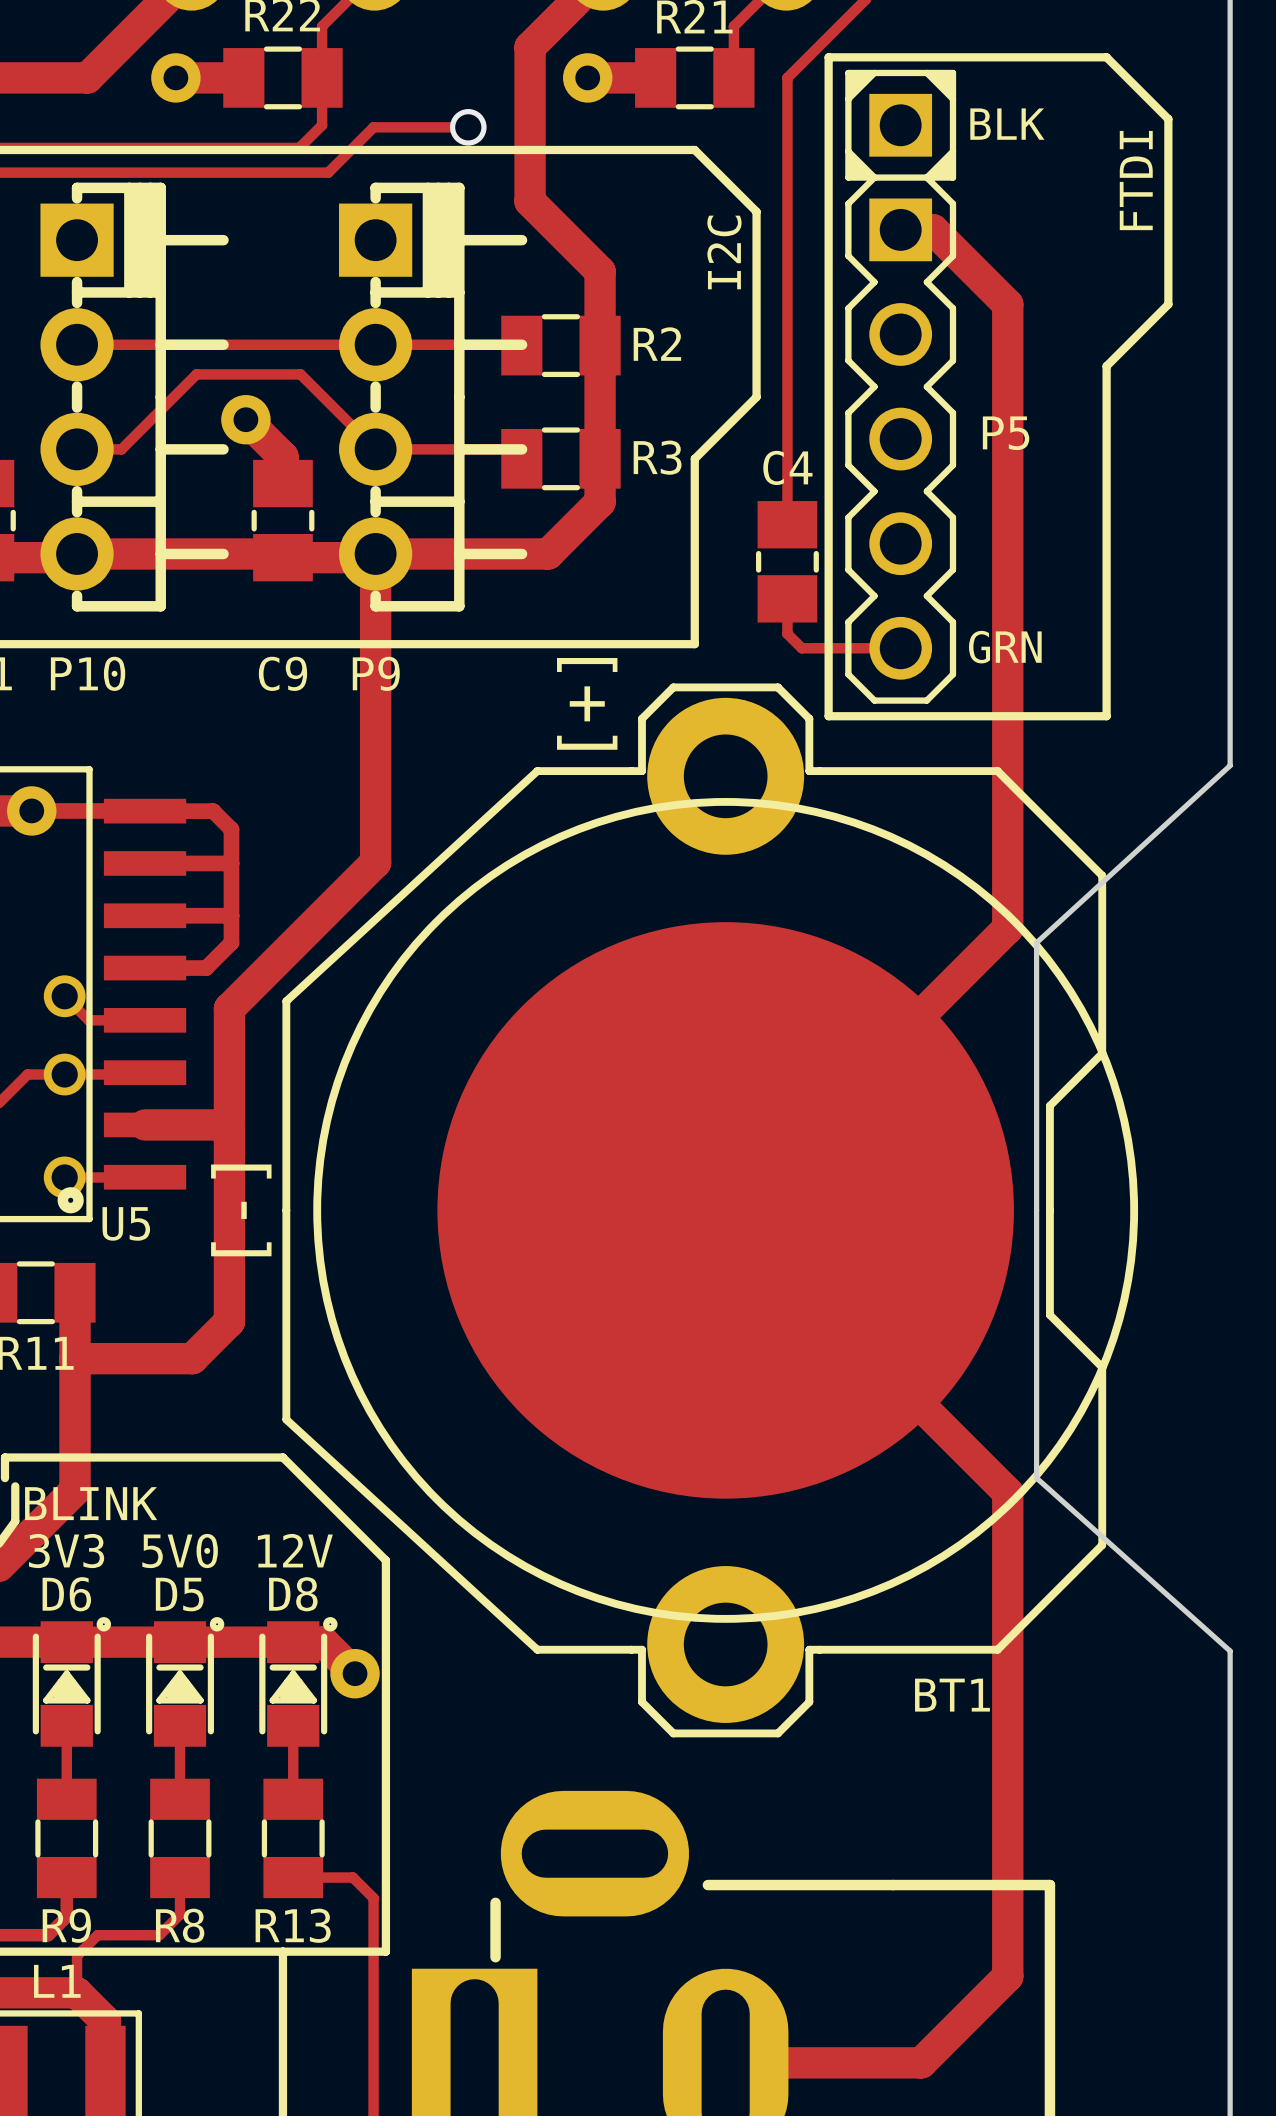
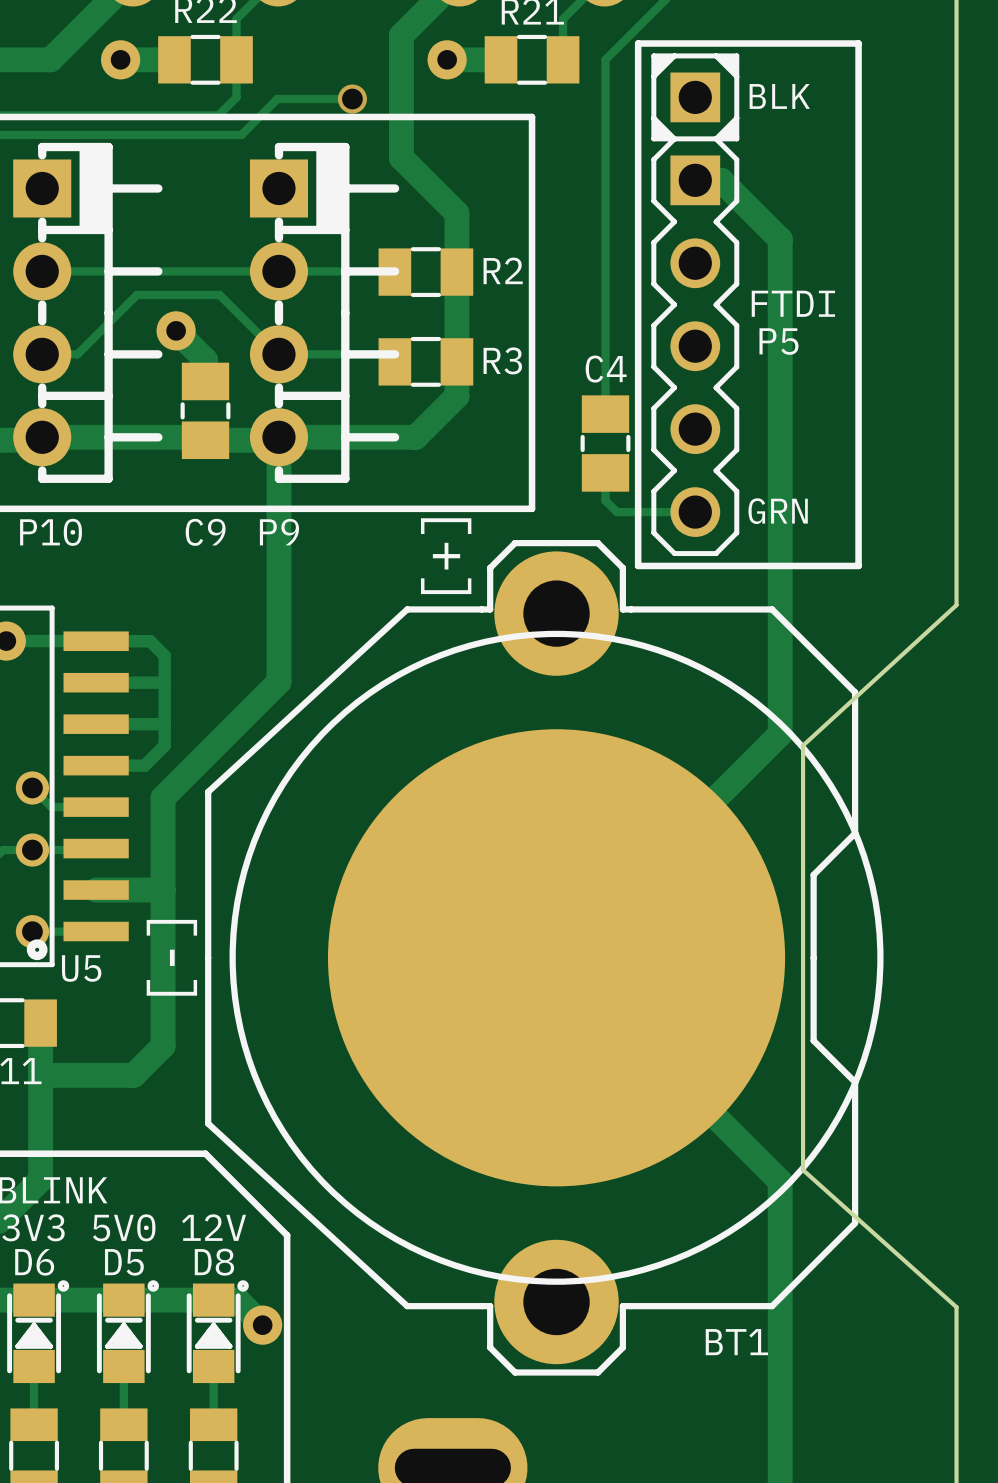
line: (1106, 57) (1168, 119) (1168, 304) (1106, 366) -> (858, 43) (858, 288)
line: (694, 149) (756, 211) (756, 397) (694, 458) -> (532, 116) (532, 361)
P5 value rotation: 0° (1136, 180) -> 90° clockwise (793, 303)
P5 value position: FTDI (1136, 180) -> FTDI (793, 303)
text: I2C (724, 252) -> none

